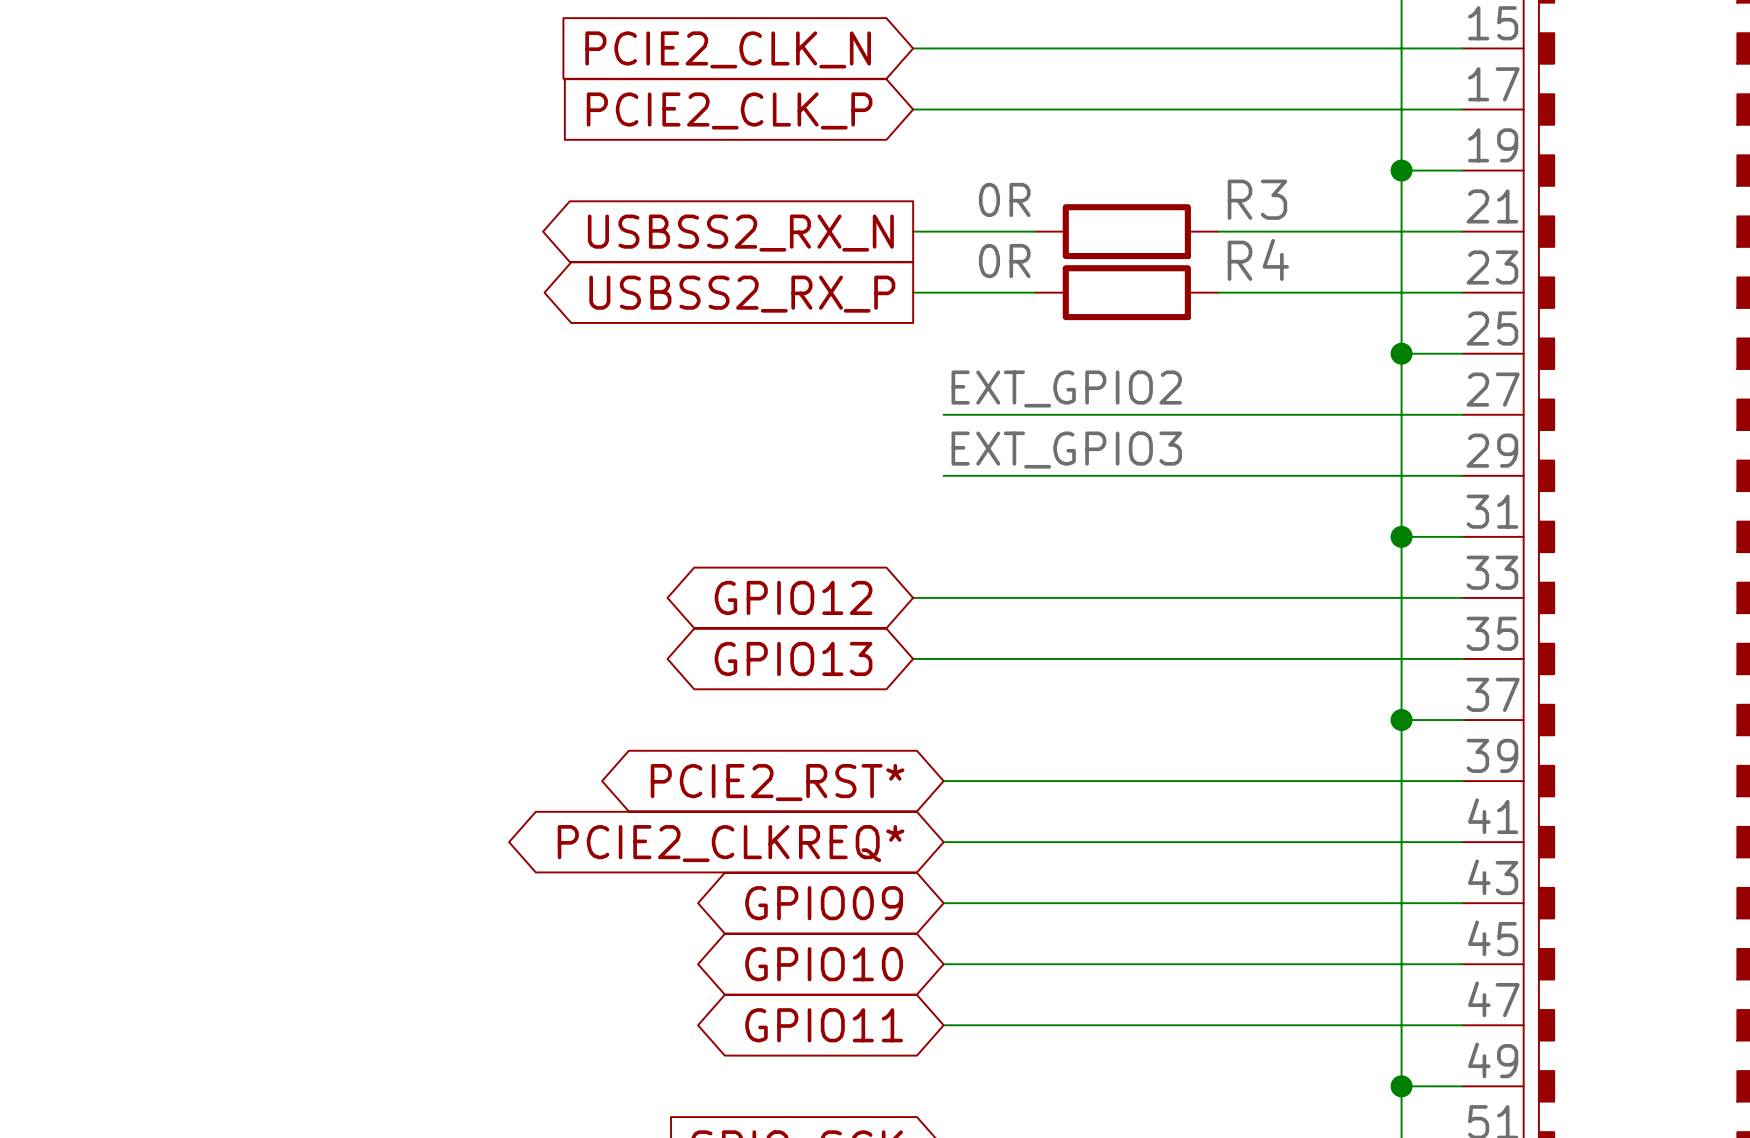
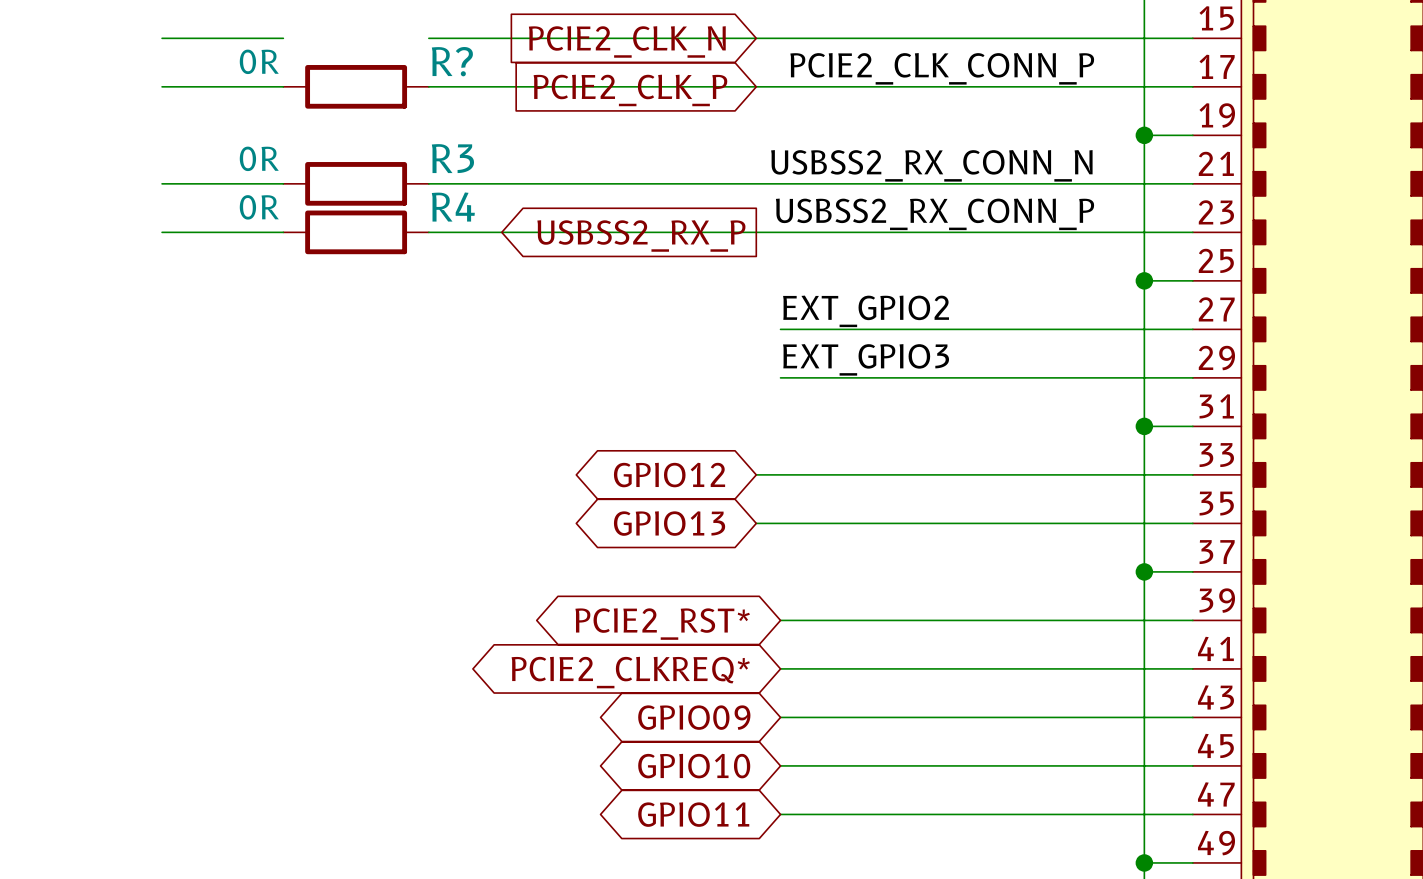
wire: none -> (162, 38) (283, 38)
wire: none -> (428, 38) (756, 38)
label: none -> PCIE2_CLK_CONN_P (942, 68)
wire: none -> (162, 86) (283, 86)
R?: none -> (356, 86)
wire: none -> (428, 86) (756, 86)
label: none -> USBSS2_RX_CONN_N (931, 165)
wire: none -> (162, 183) (283, 183)
wire: none -> (428, 183) (756, 183)
wire: none -> (853, 183) (998, 183)
R3 position: (1126, 231) -> (356, 183)
global label: USBSS2_RX_N (740, 233) -> none
label: none -> USBSS2_RX_CONN_P (935, 214)
wire: none -> (162, 232) (283, 232)
wire: none -> (428, 232) (756, 232)
wire: none -> (853, 232) (998, 232)
R4 position: (1126, 292) -> (356, 232)

